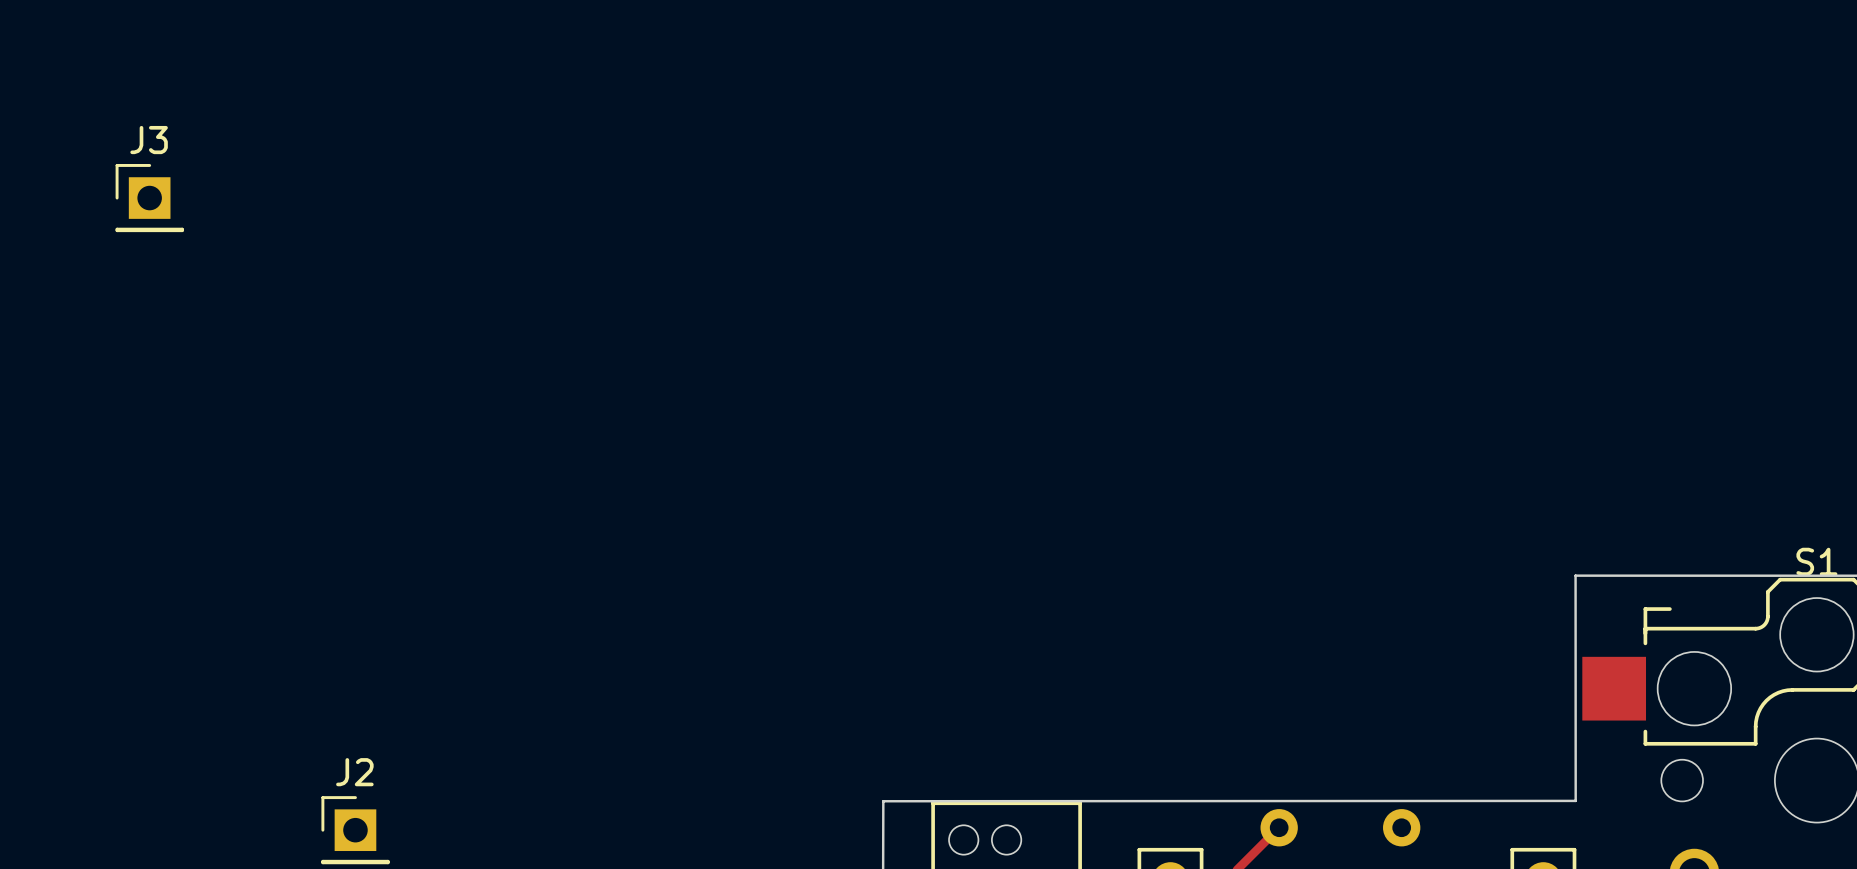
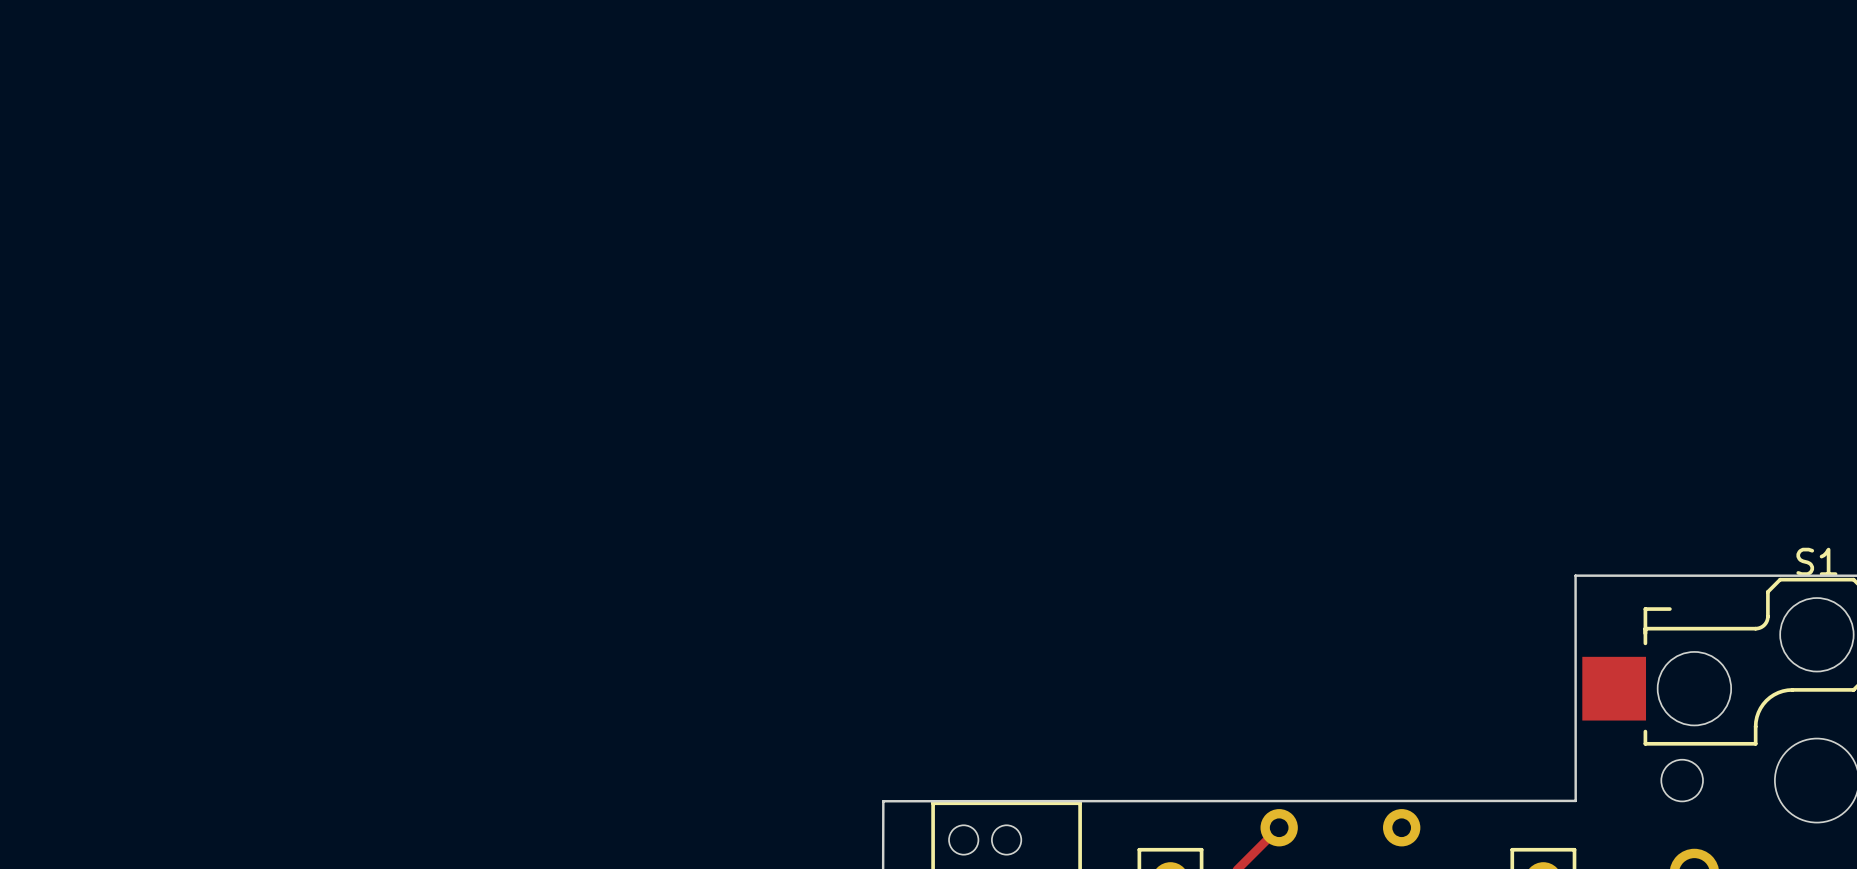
J3: (149, 198) -> none
J2: (355, 830) -> none

